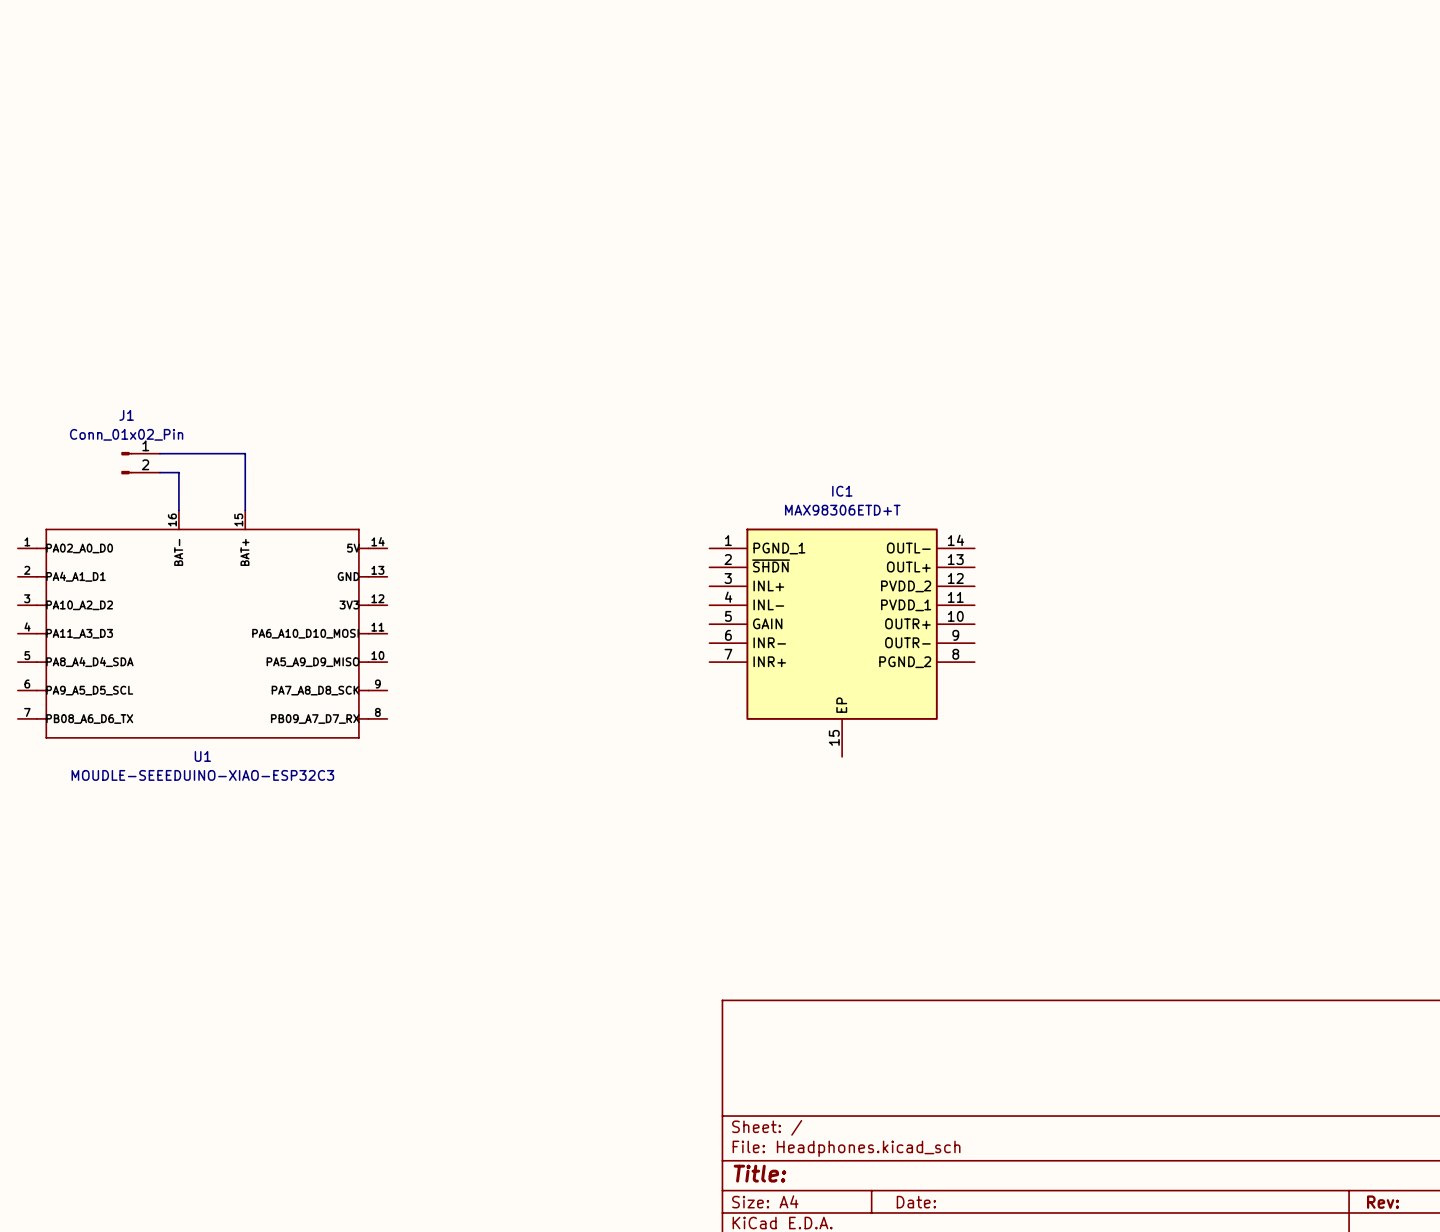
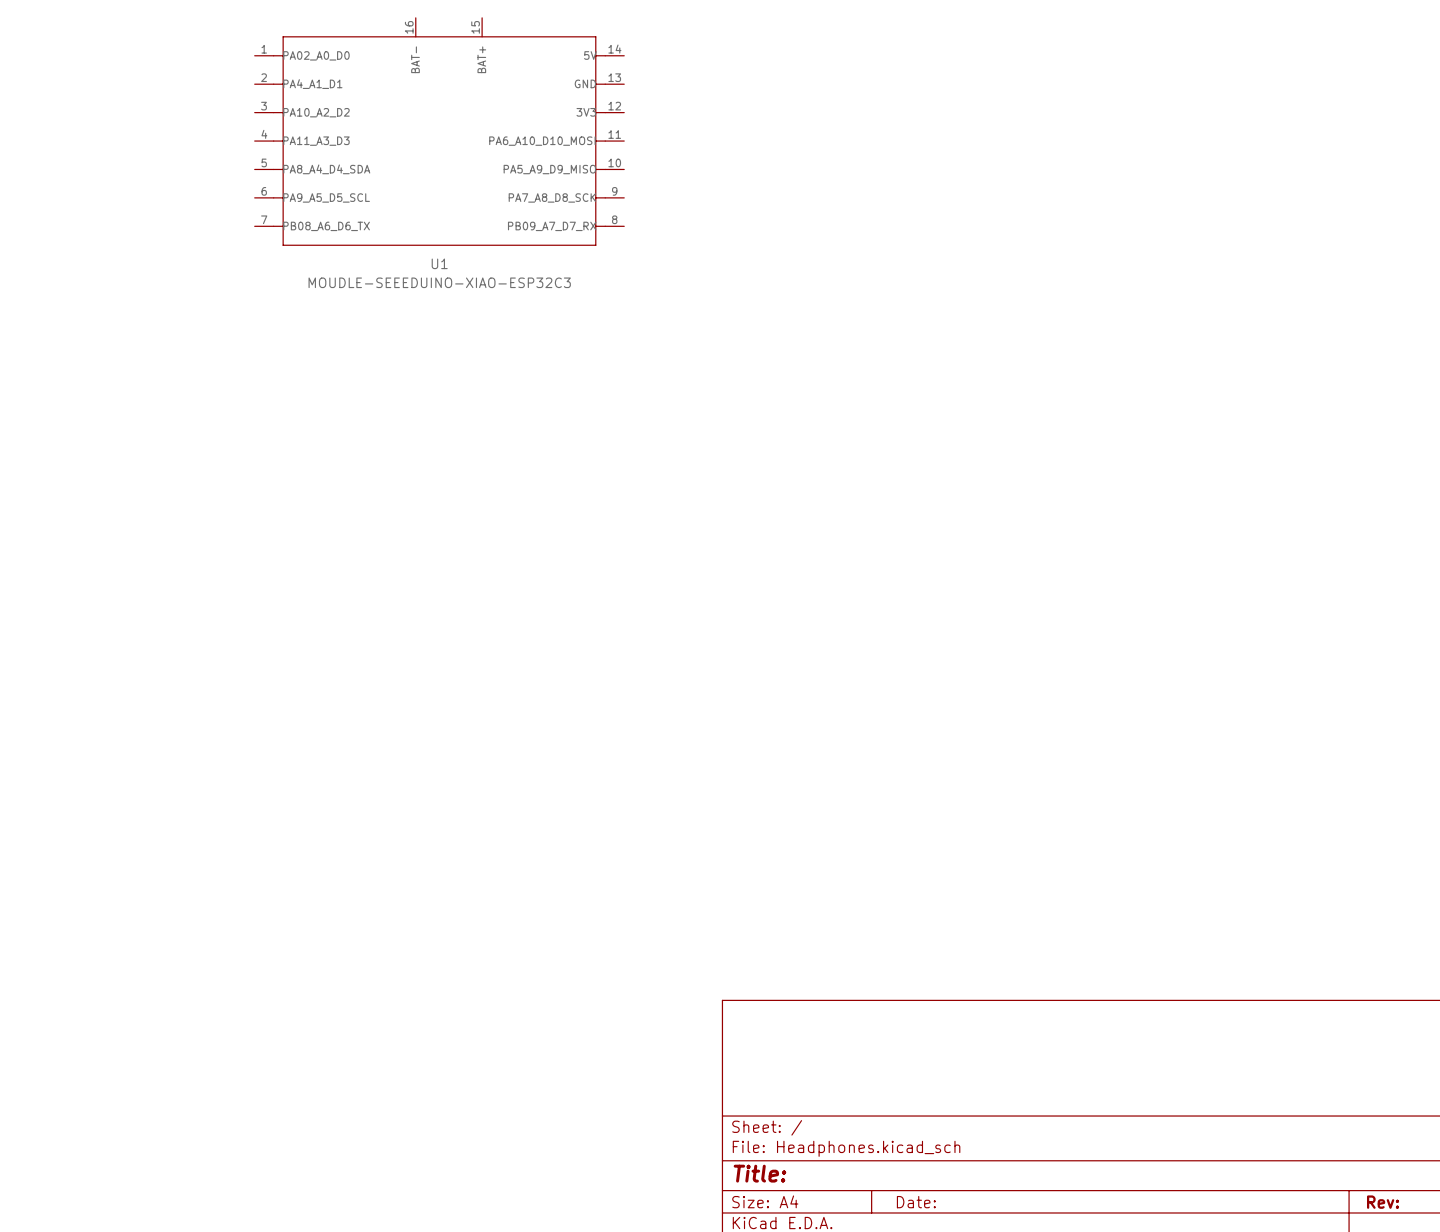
wire: (159, 453) (245, 453) (245, 510) -> none
J1: Conn_01x02_Pin (140, 463) -> none
wire: (159, 472) (178, 472) (178, 510) -> none
U1 position: (202, 624) -> (439, 131)
IC1: MAX98306ETD+T (842, 642) -> none

